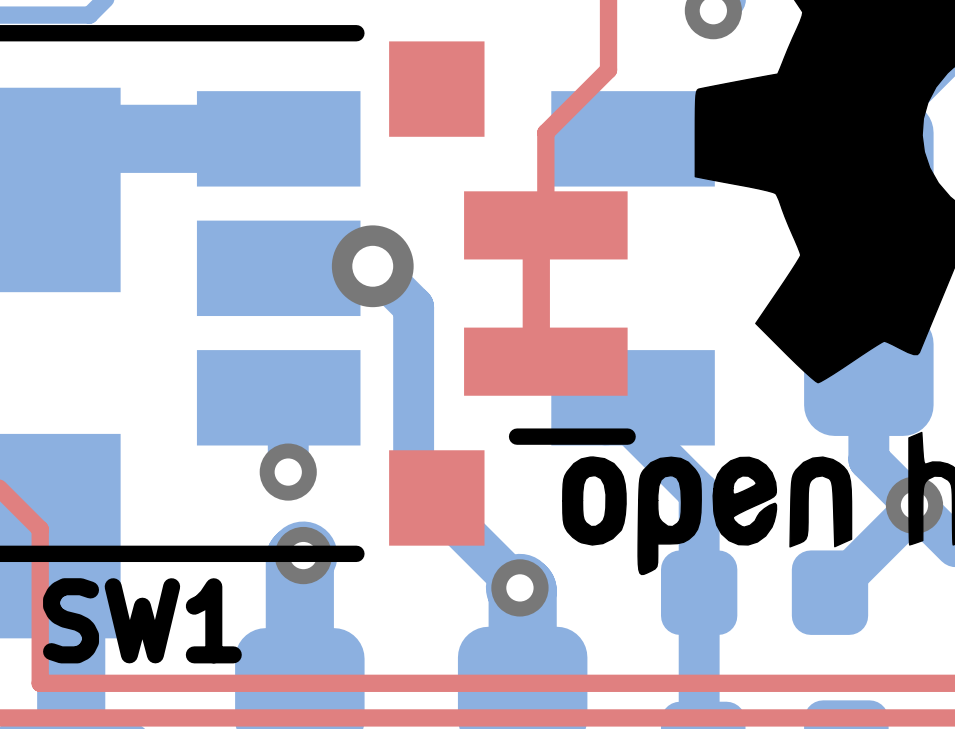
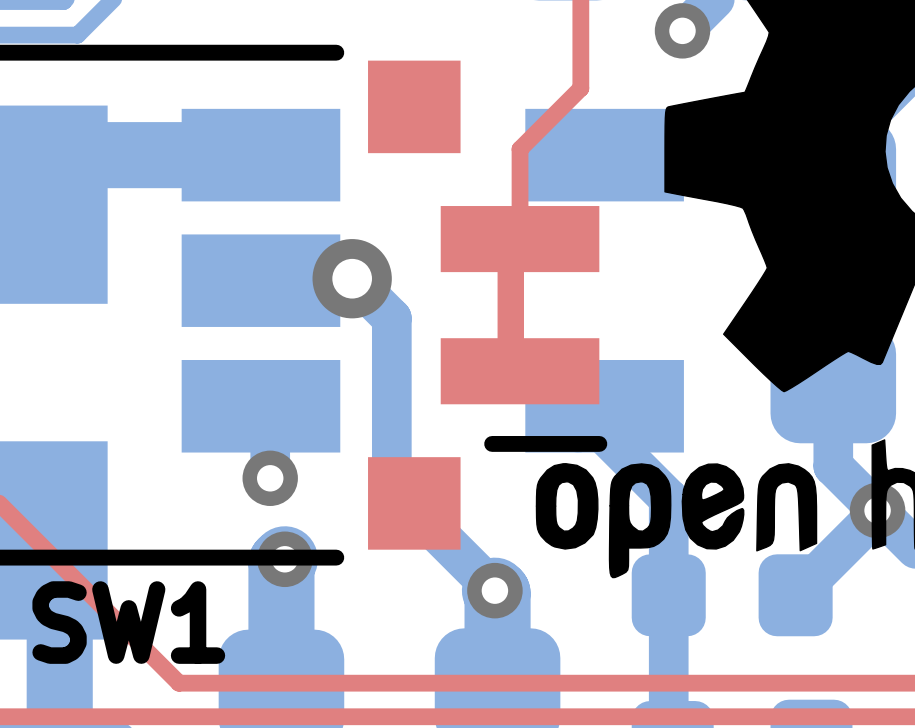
top track: (40, 529) (40, 683) (194, 683) -> (29, 533) (179, 683)

